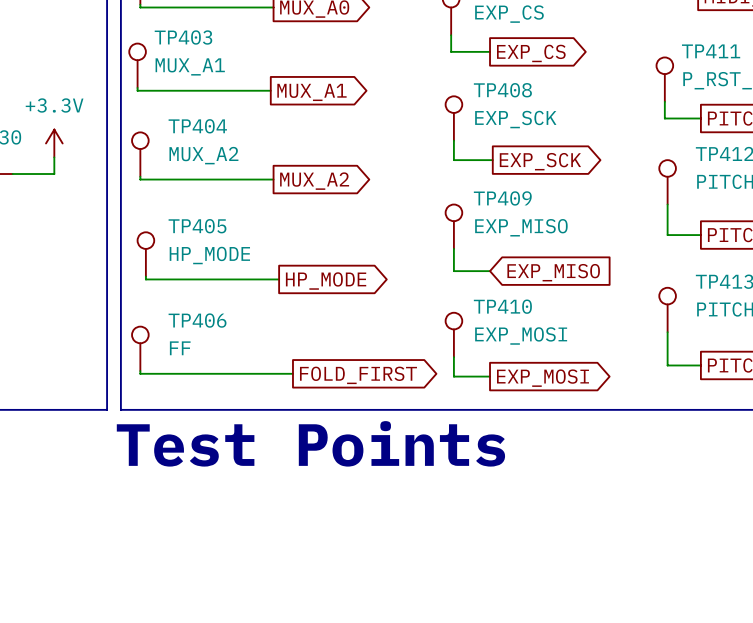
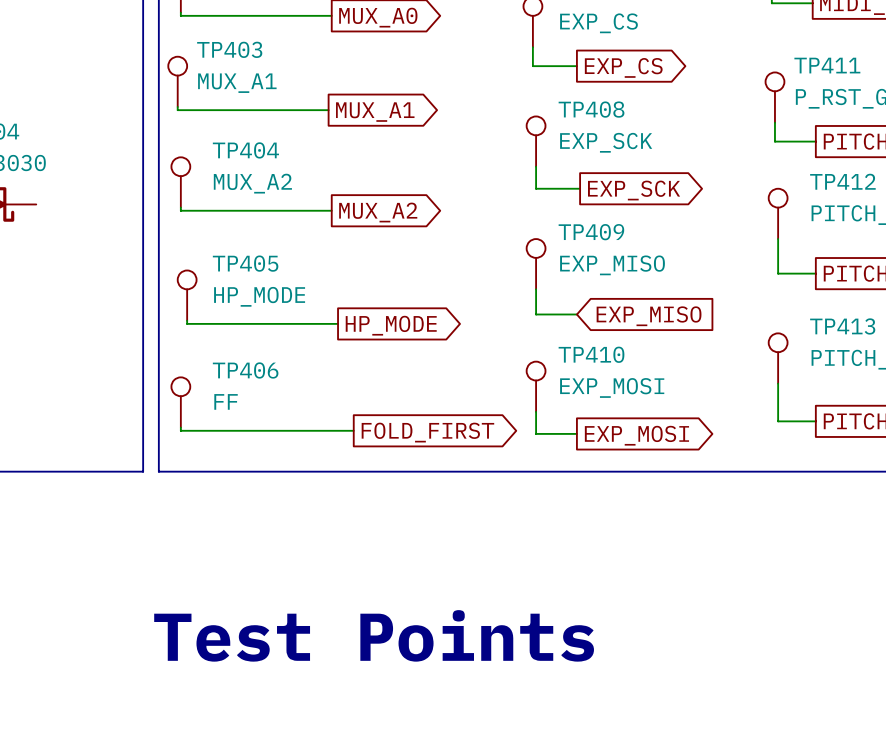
power symbol: +3.3V (54, 143) -> none
wire: (54, 157) (54, 174) (12, 174) -> none
text position: Test Points (310, 443) -> Test Points (374, 635)

